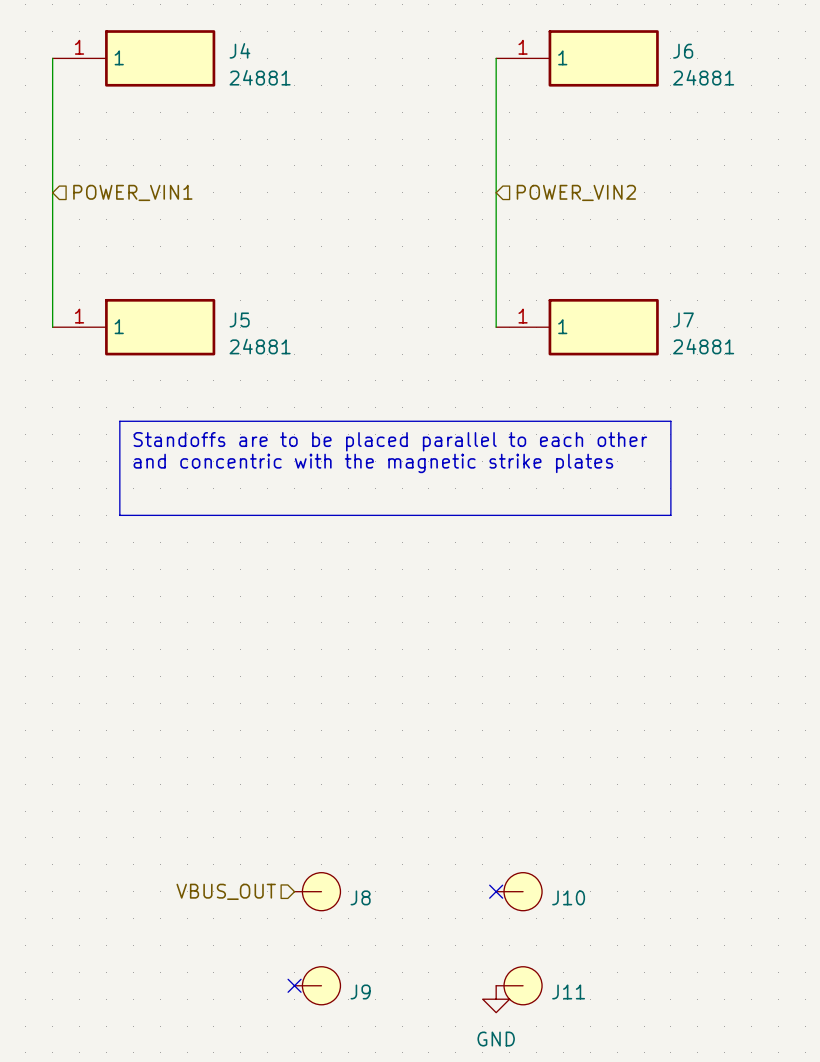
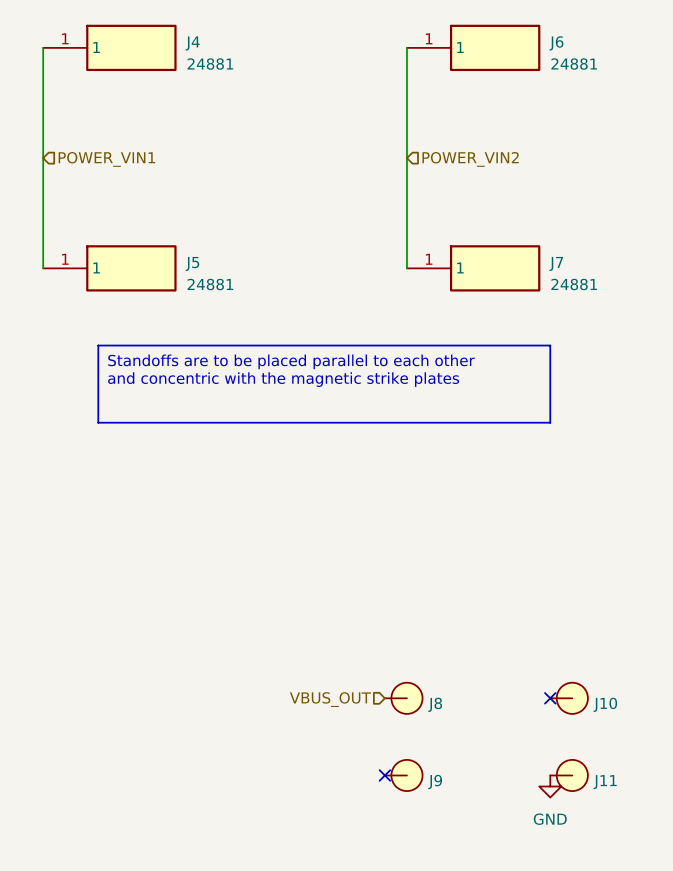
no-connect mark: none -> (550, 698)
hierarchical label position: VBUS_OUT (226, 891) -> VBUS_OUT (330, 699)
J8 position: (317, 891) -> (403, 698)
no-connect mark position: (496, 891) -> (384, 775)
J10 position: (519, 891) -> (569, 698)
no-connect mark: (294, 985) -> none
J9 position: (317, 985) -> (403, 775)
J11 position: (519, 985) -> (569, 775)
power symbol position: GND (496, 999) -> GND (550, 786)

